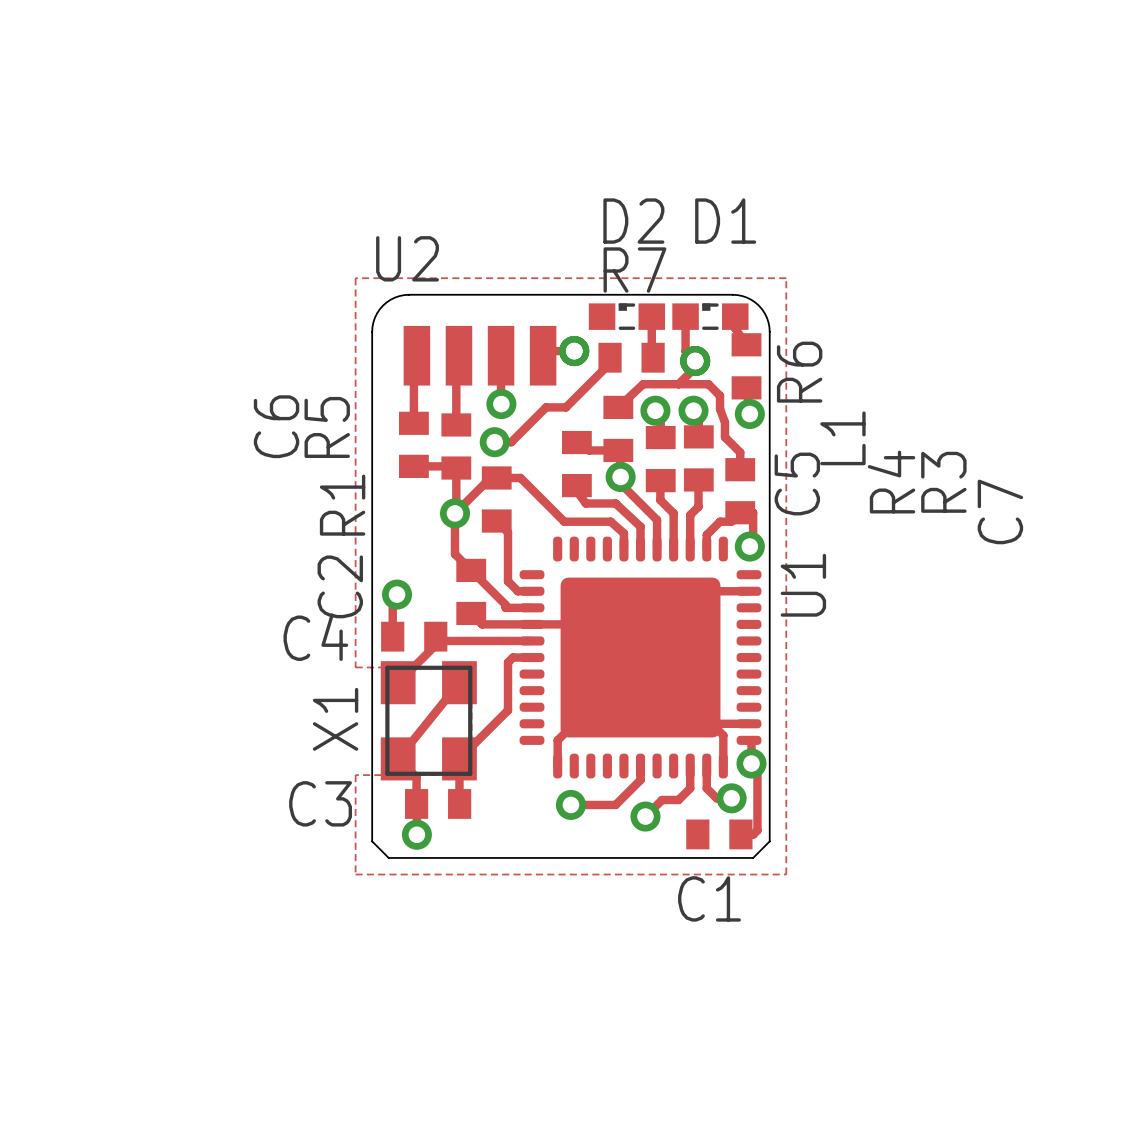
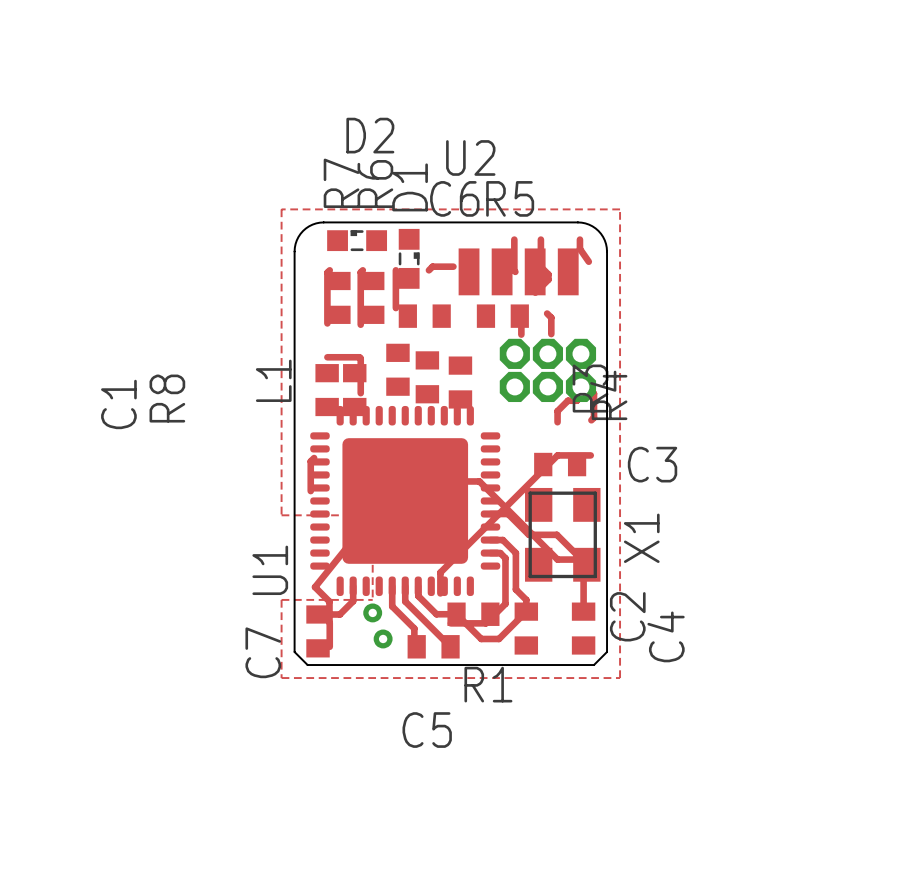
D2 name position: D2 (633, 221) -> D2 (370, 135)
R7 name position: R7 (634, 270) -> R7 (341, 183)
D2 position: (626, 316) -> (357, 240)
D1 rotation: 0° (710, 316) -> 90° clockwise (409, 258)
D1 position: (710, 316) -> (409, 258)
U2 footprint: [403, 325, 557, 386] -> [458, 248, 579, 296]
via: (574, 351) -> none
track: (610, 357) (610, 363) (565, 407) (546, 407) (511, 442) (494, 442) -> none
R7 rotation: 0° (631, 357) -> 90° clockwise (338, 297)
R7 position: (631, 357) -> (338, 297)
via: (695, 361) -> none
R6 position: (746, 366) -> (372, 297)
R6 name position: R6 (799, 372) -> R6 (375, 184)
via: (501, 404) -> none
track: (618, 407) (643, 384) (708, 384) (720, 395) (720, 409) (724, 422) (724, 437) (740, 452) (740, 469) -> none
via: (655, 410) -> none
via: (693, 410) -> none
via: (749, 414) -> none
L1 position: (618, 428) -> (460, 382)
L1 name position: L1 (842, 438) -> L1 (273, 380)
via: (494, 442) -> none
track: (576, 442) (589, 450) (618, 450) (620, 483) (657, 520) (657, 549) -> none
C6 rotation: 0° (413, 444) -> 90° clockwise (424, 316)
C6 position: (413, 444) -> (424, 316)
R5 rotation: 0° (456, 446) -> 90° clockwise (502, 316)
R5 position: (456, 446) -> (502, 316)
R3 position: (698, 458) -> (397, 369)
R4 position: (660, 459) -> (427, 377)
C5 rotation: 0° (576, 464) -> 90° clockwise (433, 646)
C5 position: (576, 464) -> (433, 646)
via: (620, 476) -> none
track: (698, 479) (698, 506) (690, 515) (690, 549) -> none
track: (660, 480) (660, 500) (673, 513) (673, 549) -> none
part: none -> (547, 370)
C5 name position: C5 (797, 484) -> C5 (427, 730)
track: (576, 485) (576, 491) (585, 503) (615, 503) (640, 526) (640, 549) -> none
C7 position: (740, 491) -> (318, 631)
R1 rotation: 0° (496, 499) -> 90° clockwise (473, 614)
R1 position: (496, 499) -> (473, 614)
R1 name position: R1 (342, 505) -> R1 (488, 684)
R8: none -> (354, 390)
C7 name position: C7 (1000, 511) -> C7 (263, 652)
via: (454, 513) -> none
track: (496, 521) (508, 532) (508, 581) (517, 591) (532, 591) -> none
via: (749, 546) -> none
track: (623, 549) (623, 533) (610, 521) (564, 521) (520, 477) (490, 477) (454, 513) (454, 554) (505, 604) (505, 607) (532, 607) -> none
U1 name position: U1 (803, 585) -> U1 (270, 570)
C2 name position: C2 (340, 586) -> C2 (627, 616)
C2 position: (471, 591) -> (526, 628)
via: (397, 594) -> none
C4 rotation: 0° (414, 636) -> 90° clockwise (583, 628)
C4 position: (414, 636) -> (583, 628)
C4 name position: C4 (315, 637) -> C4 (666, 636)
track: (532, 640) (440, 640) (435, 636) (435, 645) (398, 682) -> none
track: (532, 657) (512, 657) (508, 662) (508, 710) (459, 758) (459, 803) -> none
U1 position: (640, 657) -> (405, 500)
track: none -> (490, 514) (508, 514) (528, 534) (556, 534) (586, 564) (583, 568) (583, 611)
track: none -> (490, 540) (502, 540) (515, 553) (515, 589) (526, 599) (526, 611) (498, 638) (481, 638) (456, 614) (436, 614) (418, 596) (418, 586)
track: none -> (490, 553) (500, 553) (505, 558) (505, 592)
X1 name position: X1 (335, 719) -> X1 (641, 538)
X1 position: (428, 720) -> (562, 534)
track: (711, 723) (723, 735) (723, 766) -> none
track: (749, 740) (751, 742) (751, 763) (757, 769) (757, 830) (753, 834) (740, 834) -> none
track: none -> (353, 586) (353, 601) (339, 614) (318, 614)
track: none -> (392, 586) (392, 606) (414, 628) (414, 644) (416, 646)
track: none -> (405, 586) (405, 601) (450, 646)
via: (751, 763) -> none
track: (690, 766) (690, 788) (678, 799) (662, 799) (645, 816) -> none
track: (706, 766) (706, 788) (716, 798) (731, 798) -> none
via: none -> (372, 612)
via: (731, 798) -> none
C3 name position: C3 (320, 803) -> C3 (652, 464)
C3 position: (438, 803) -> (560, 464)
via: (570, 804) -> none
via: (645, 816) -> none
via: none -> (383, 638)
via: (416, 834) -> none
C1 rotation: 0° (719, 834) -> 90° clockwise (327, 390)
C1 position: (719, 834) -> (327, 390)
C1 name position: C1 (709, 898) -> C1 (118, 404)

